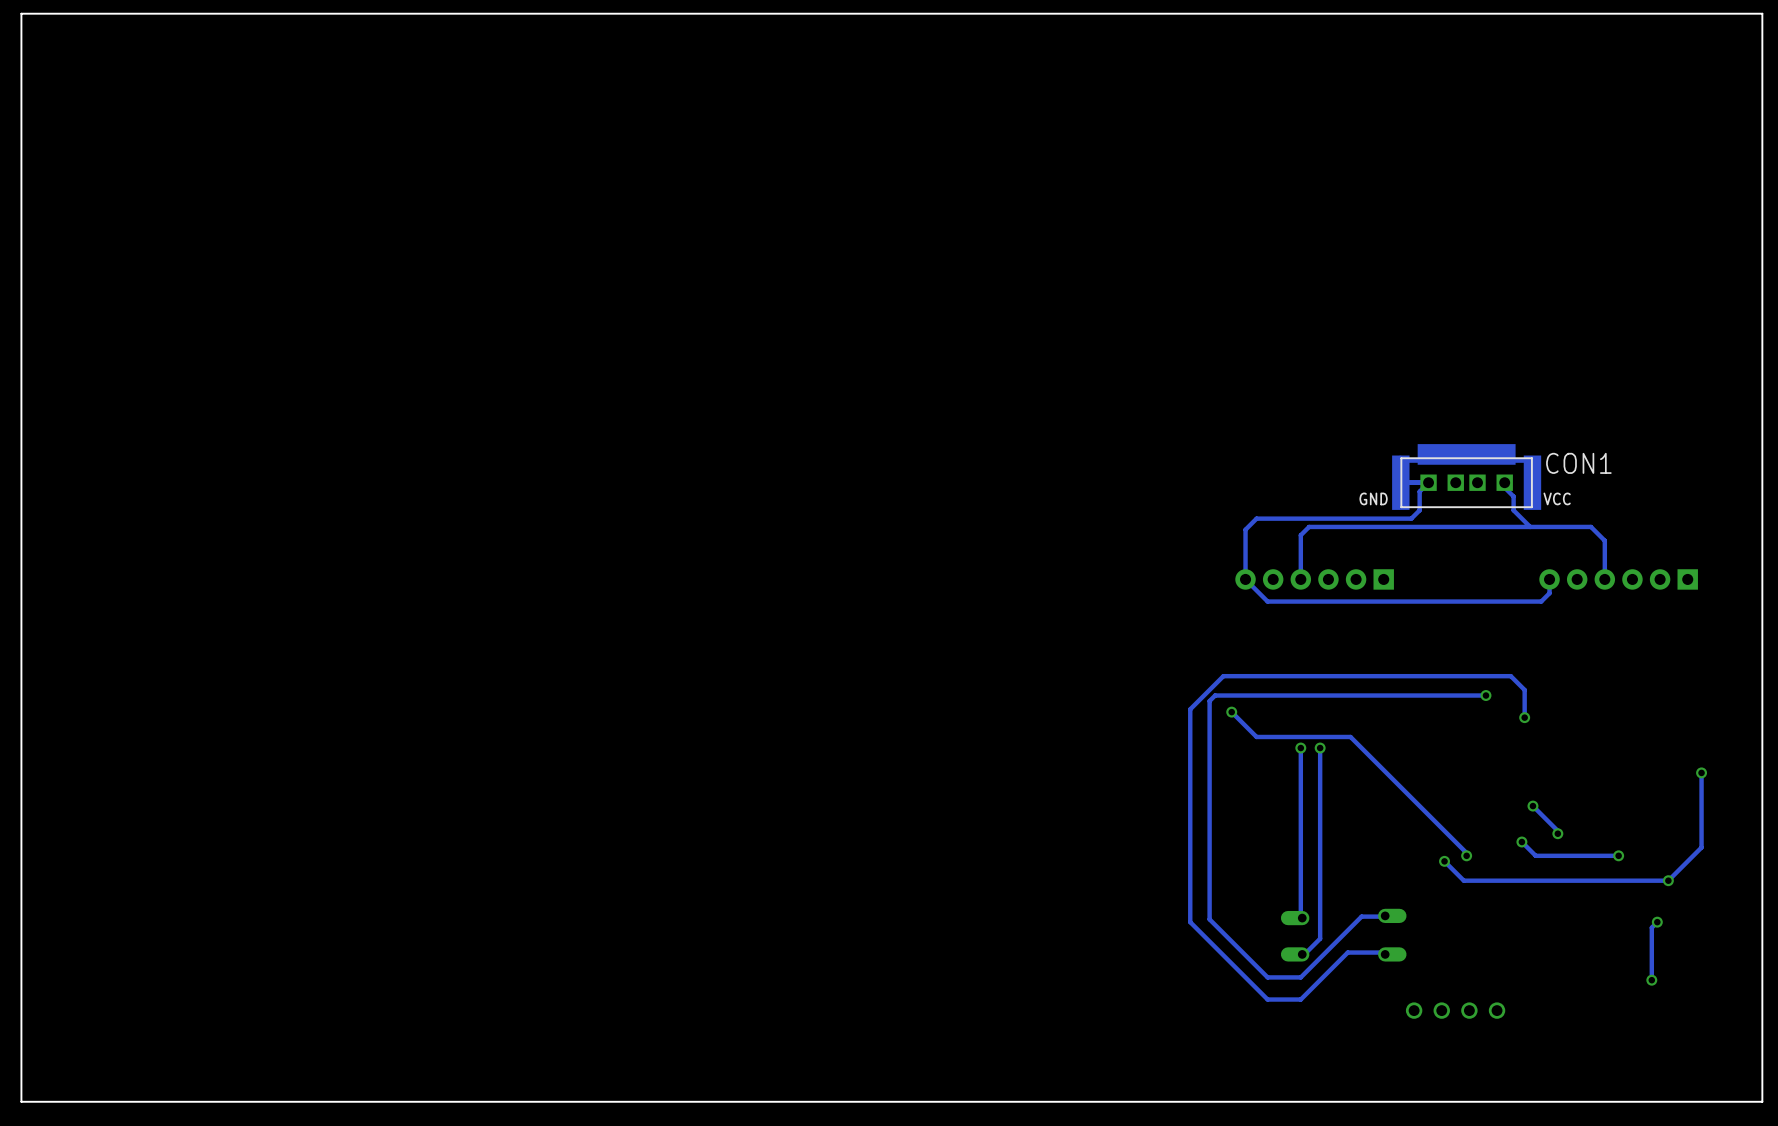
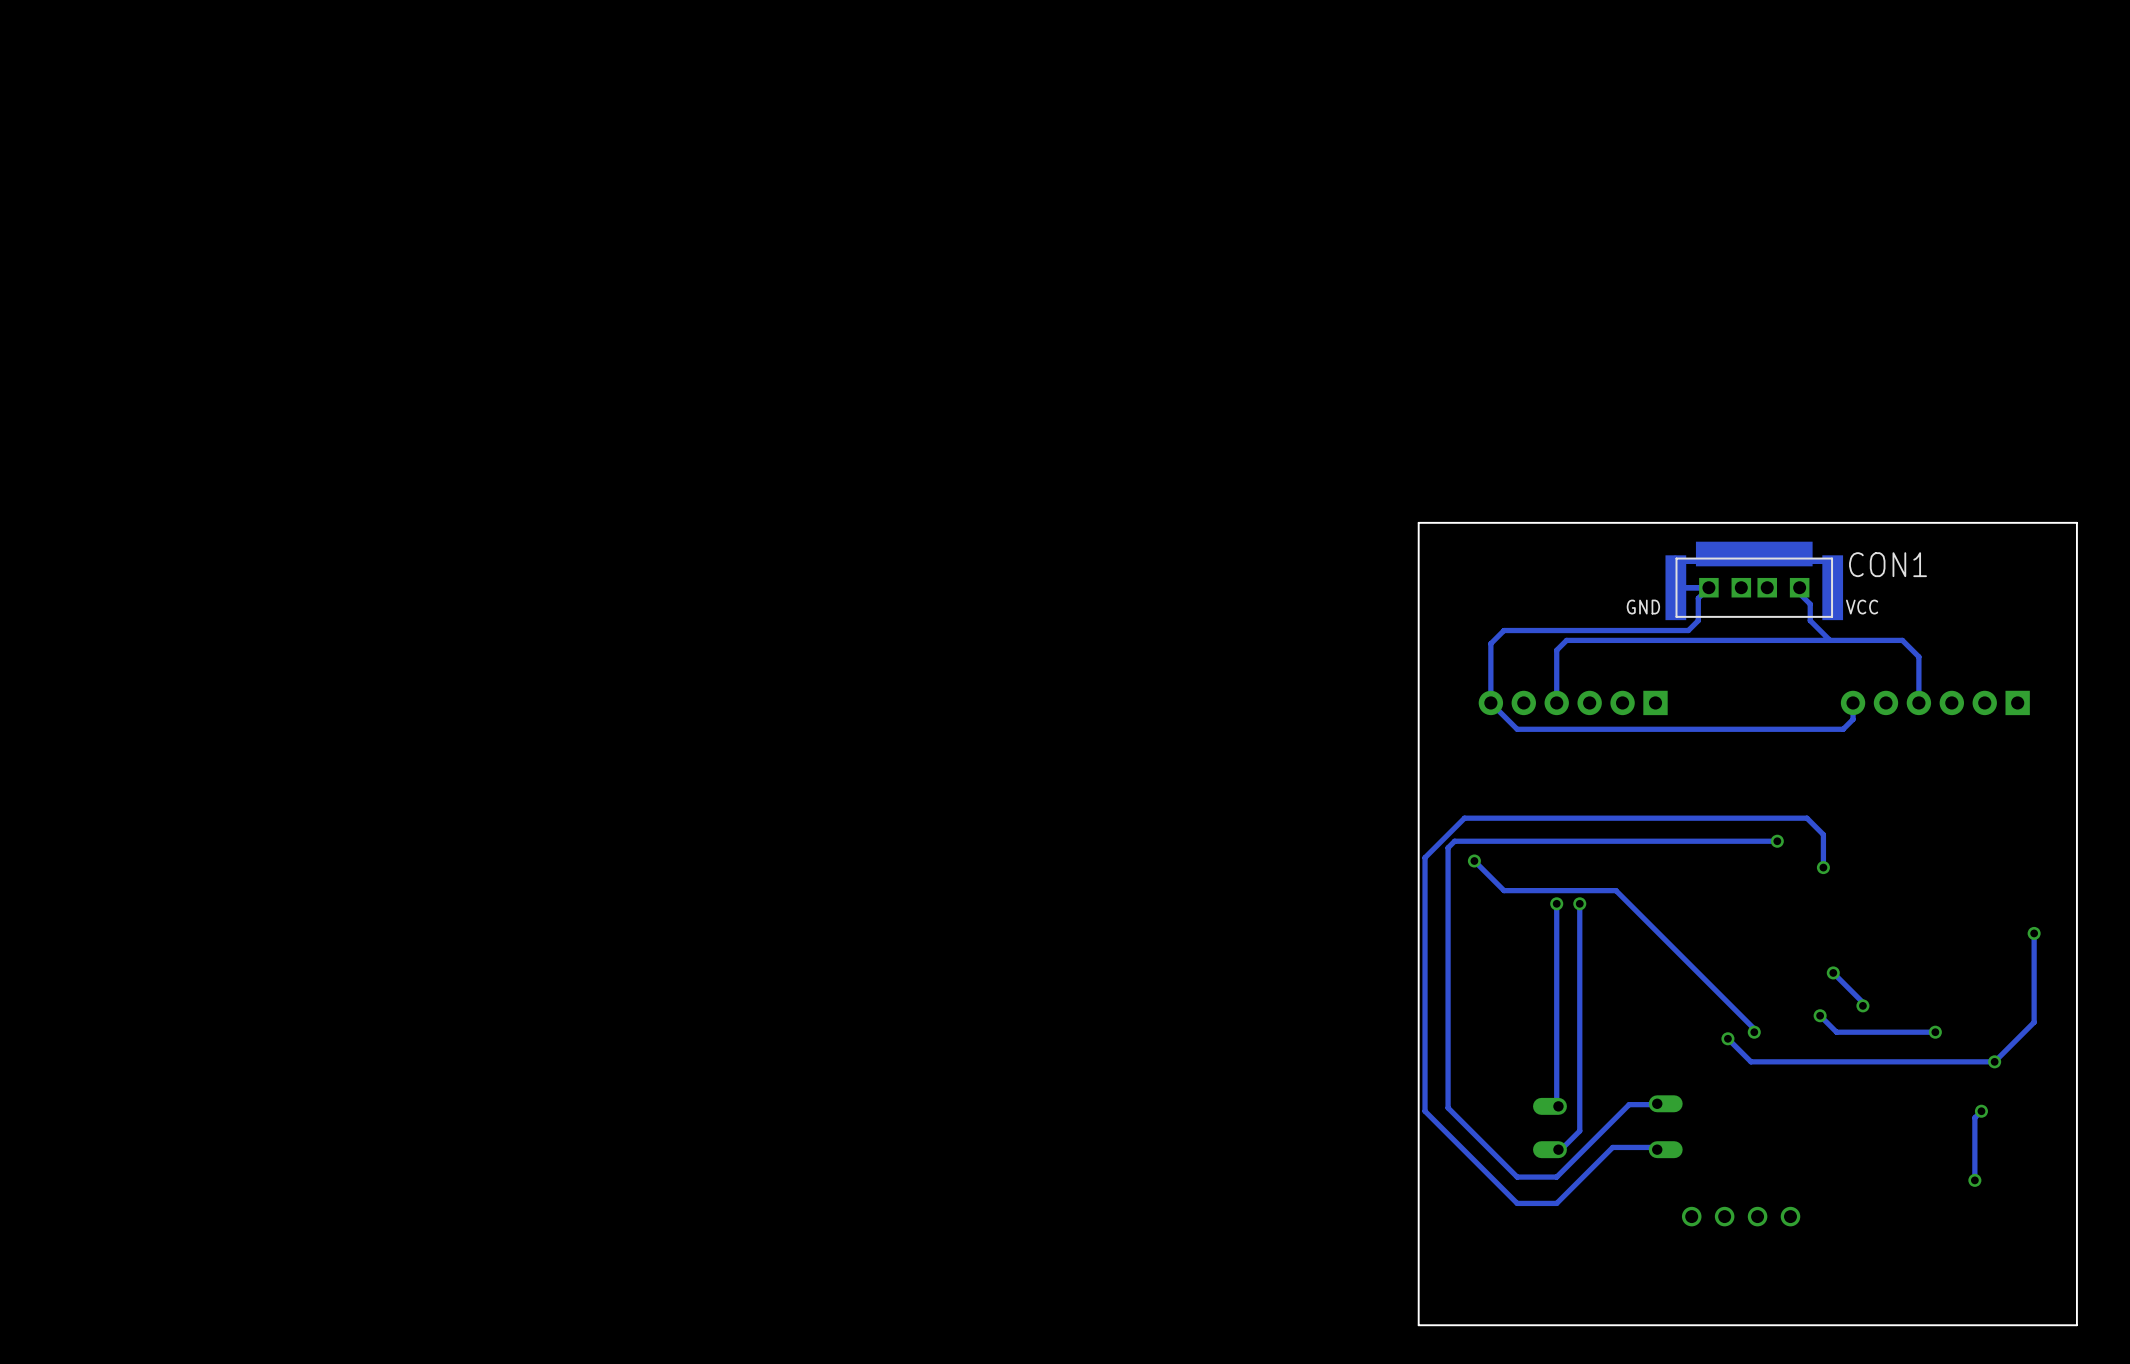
board edge: (1737, 1101) (1762, 1101) (1762, 13) (21, 13) (21, 1101) (1184, 1101) -> (2076, 1325) (2076, 522) (1418, 522) (1418, 1325)

